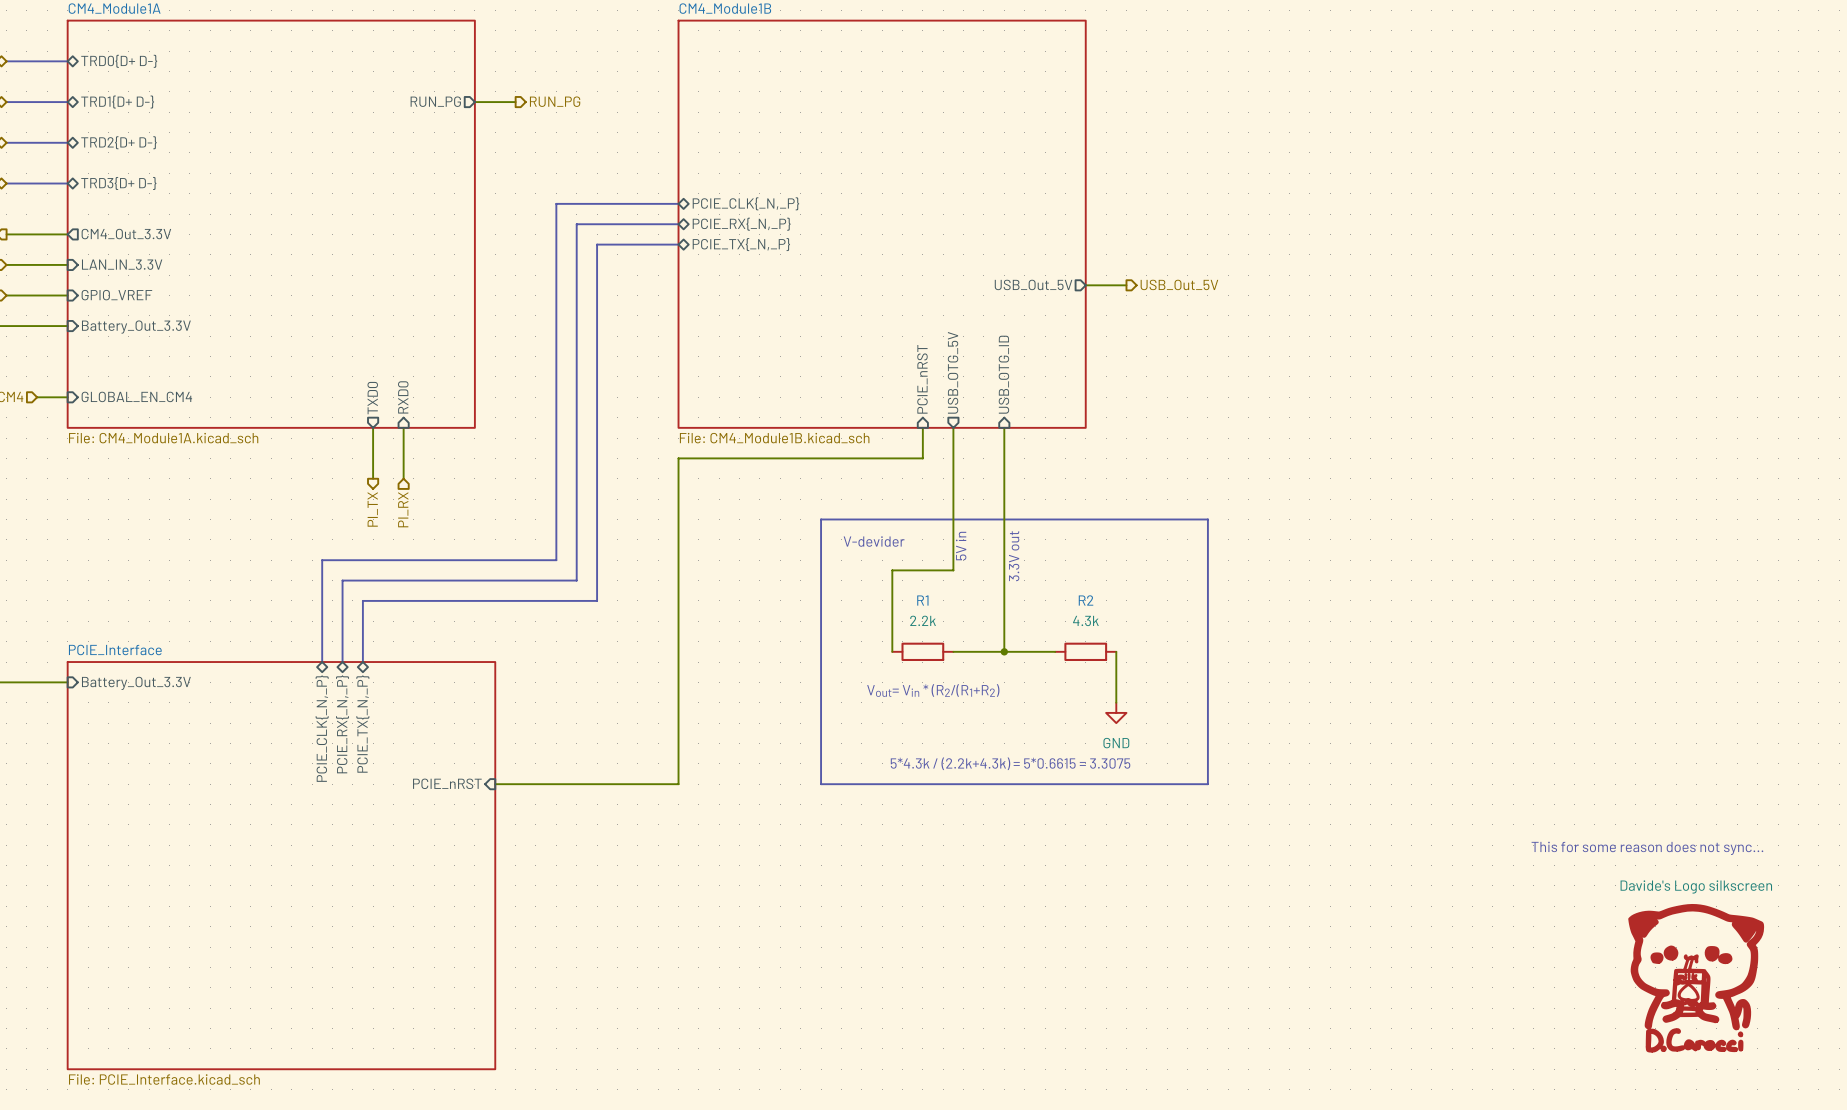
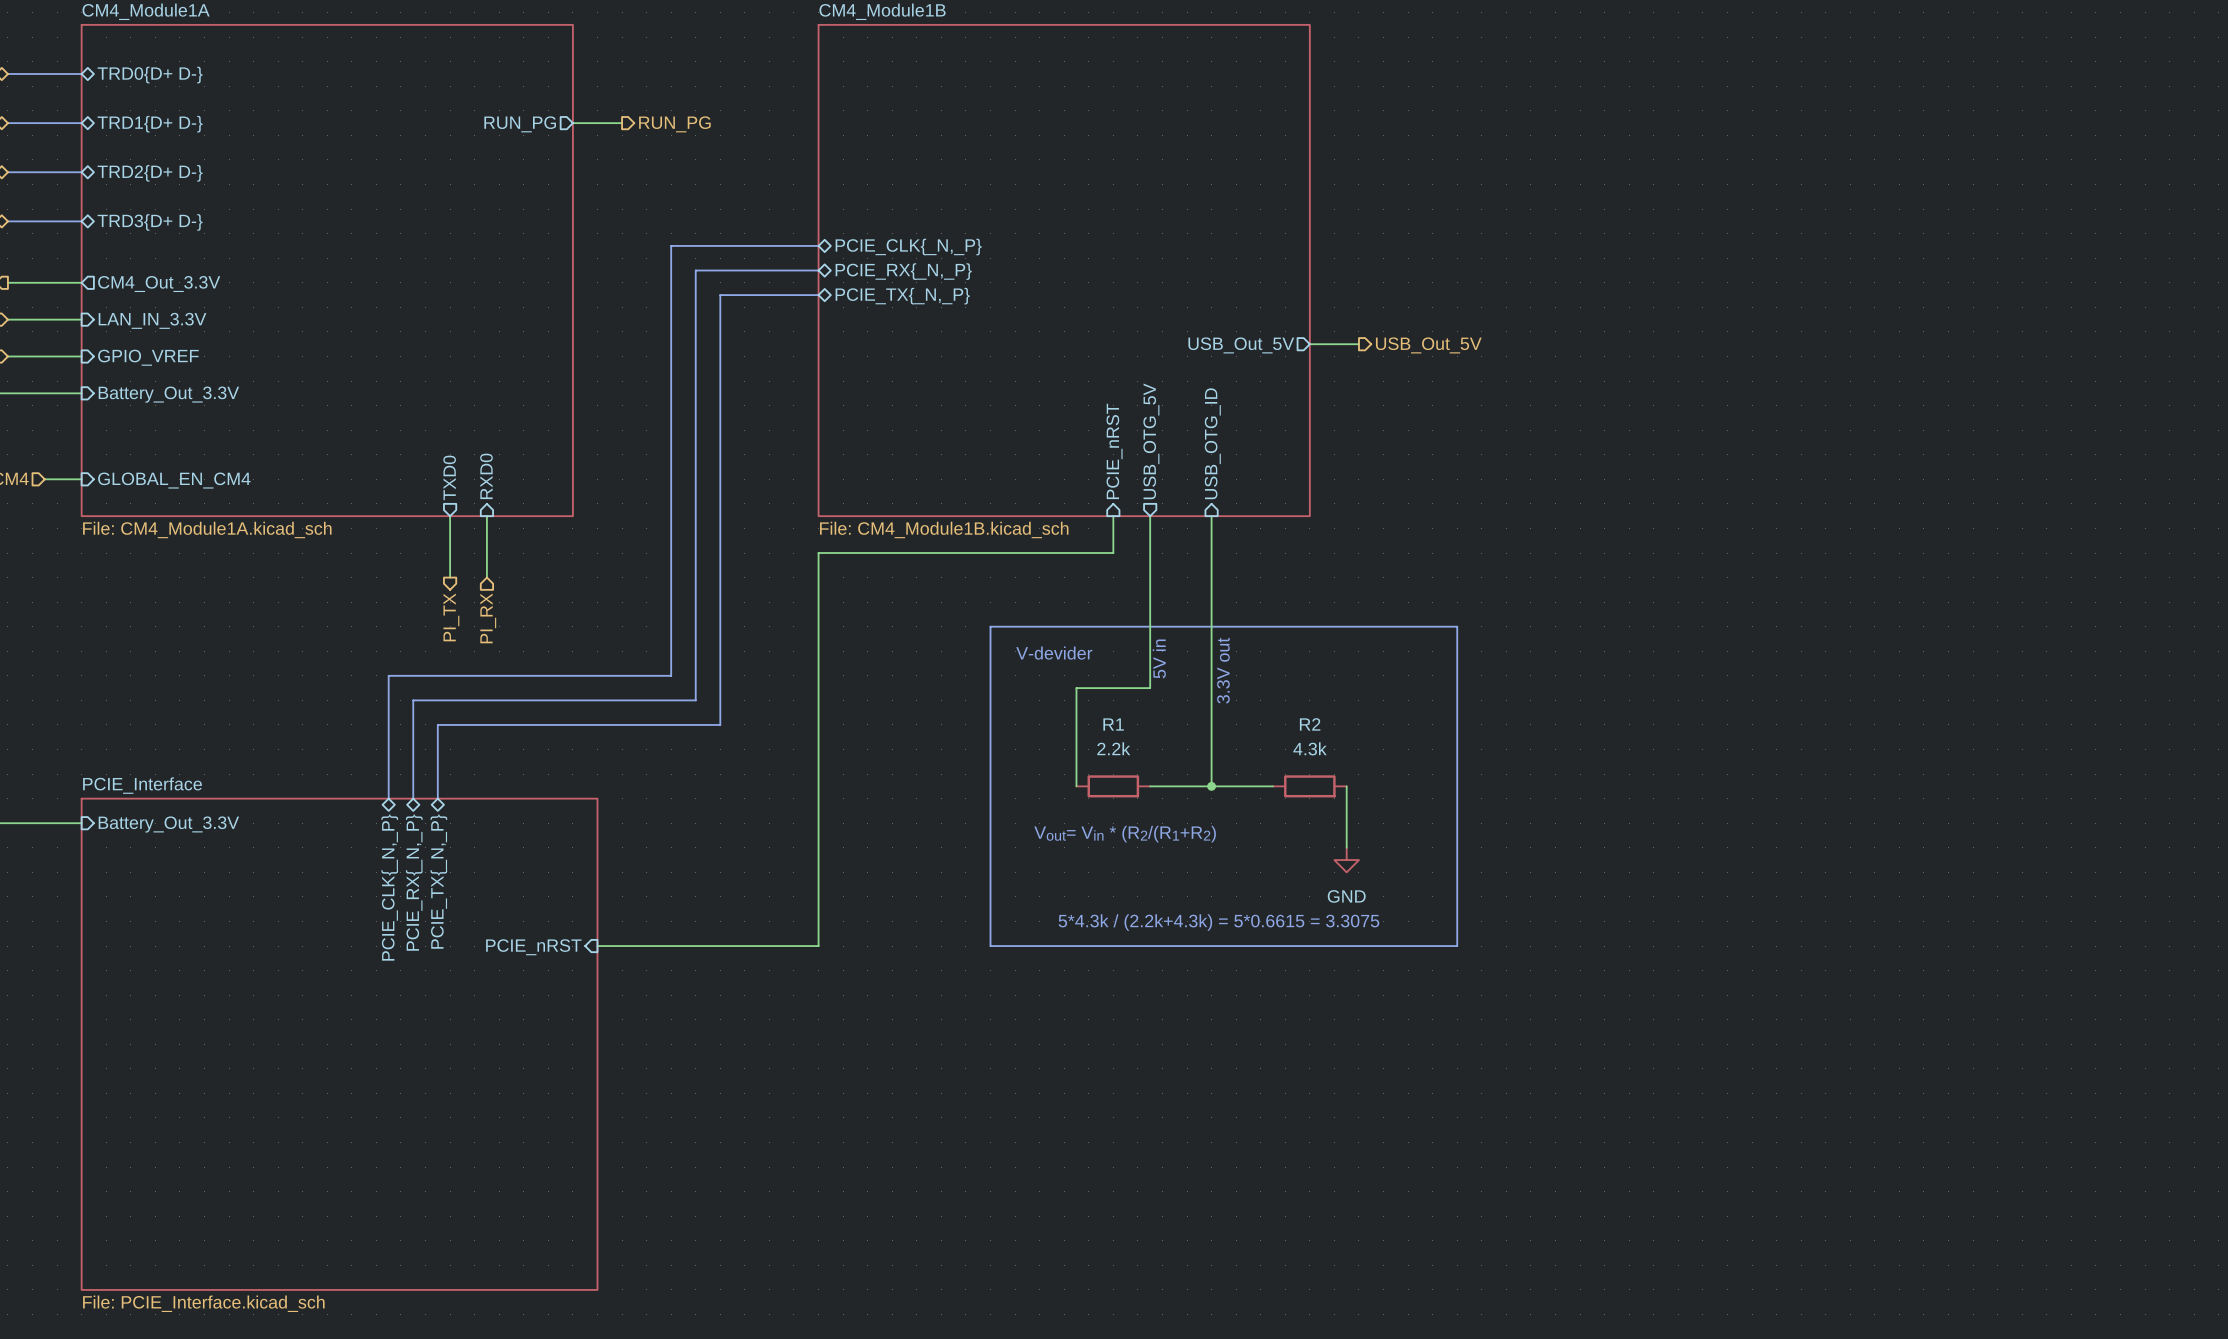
text: This for some reason does not sync... (1647, 848) -> none
power symbol: Davide's Logo silkscreen (1696, 978) -> none

